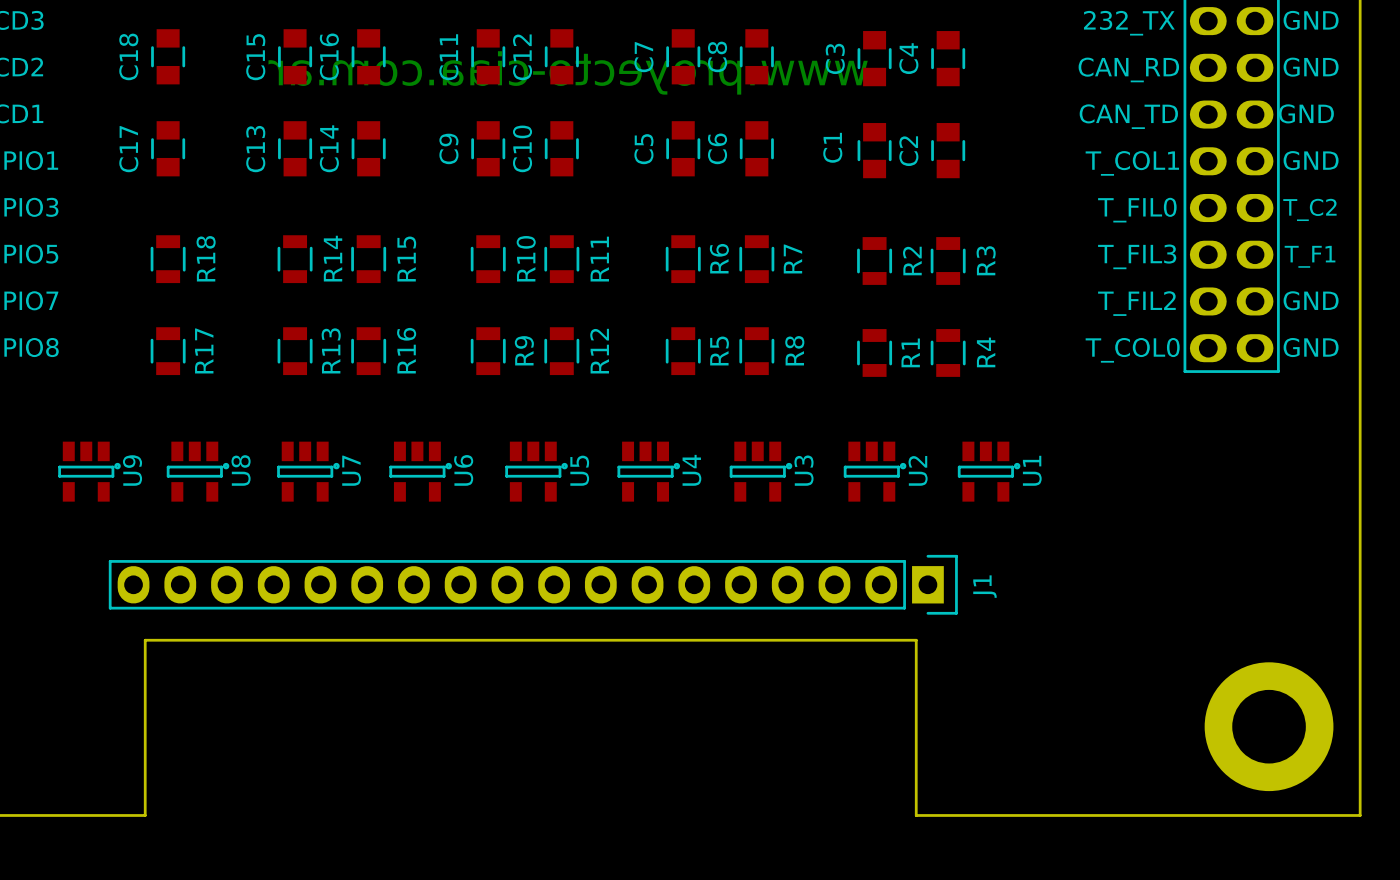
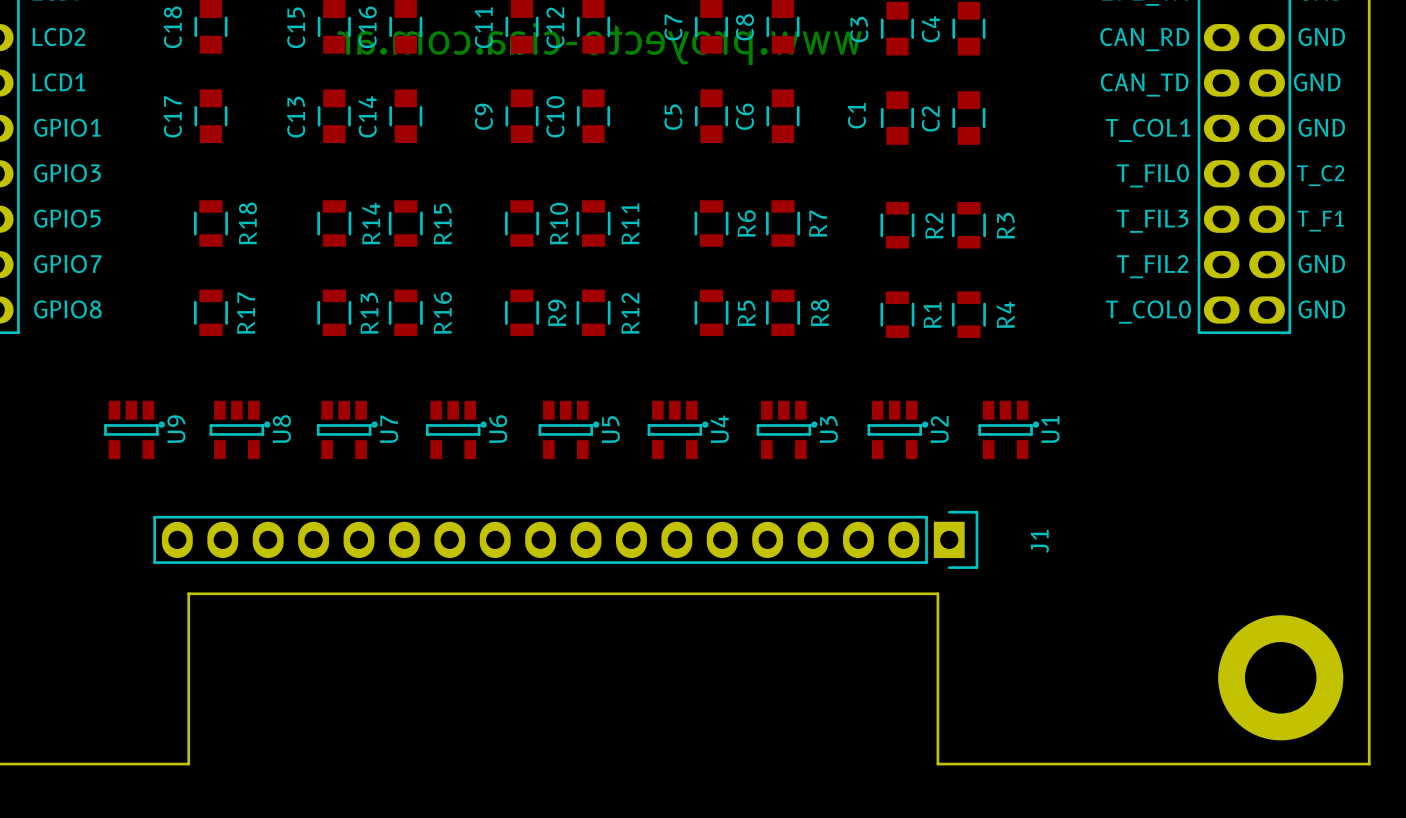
J1 name position: J1 (984, 586) -> J1 (1039, 541)

